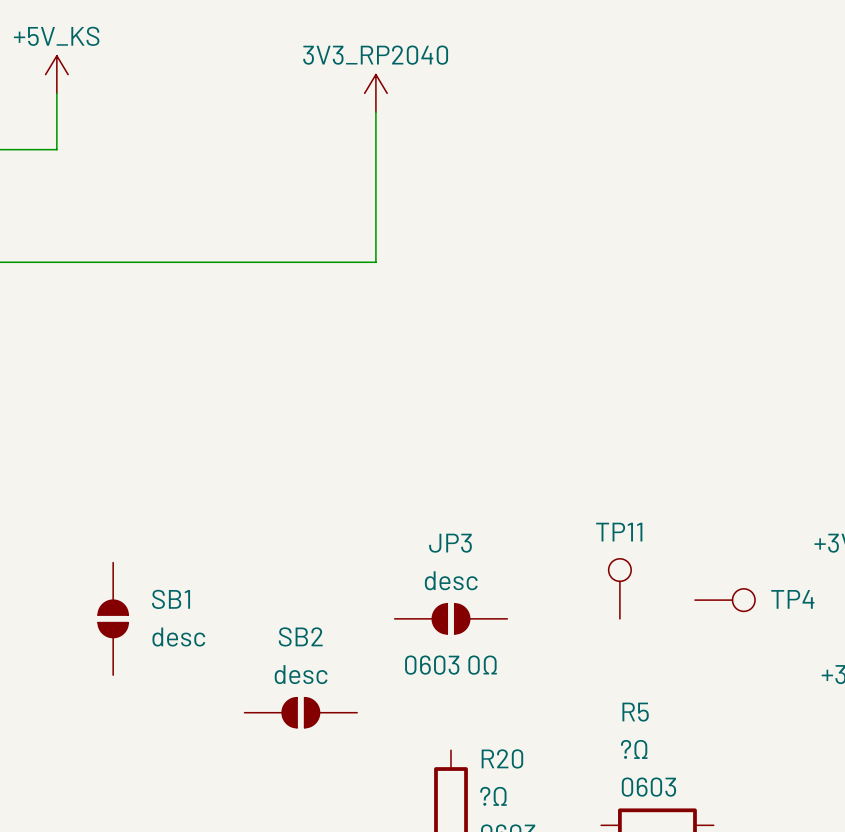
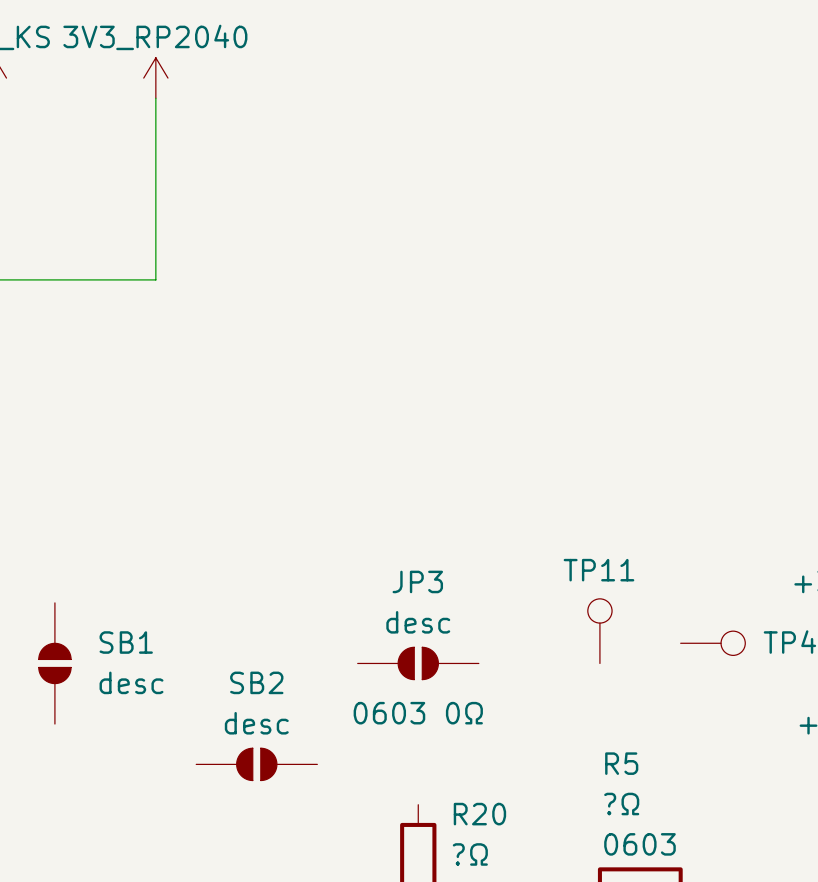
power symbol position: 3V3_RP2040 (375, 93) -> 3V3_RP2040 (155, 78)
wire: (375, 112) (375, 262) (207, 262) -> (155, 98) (155, 279)

